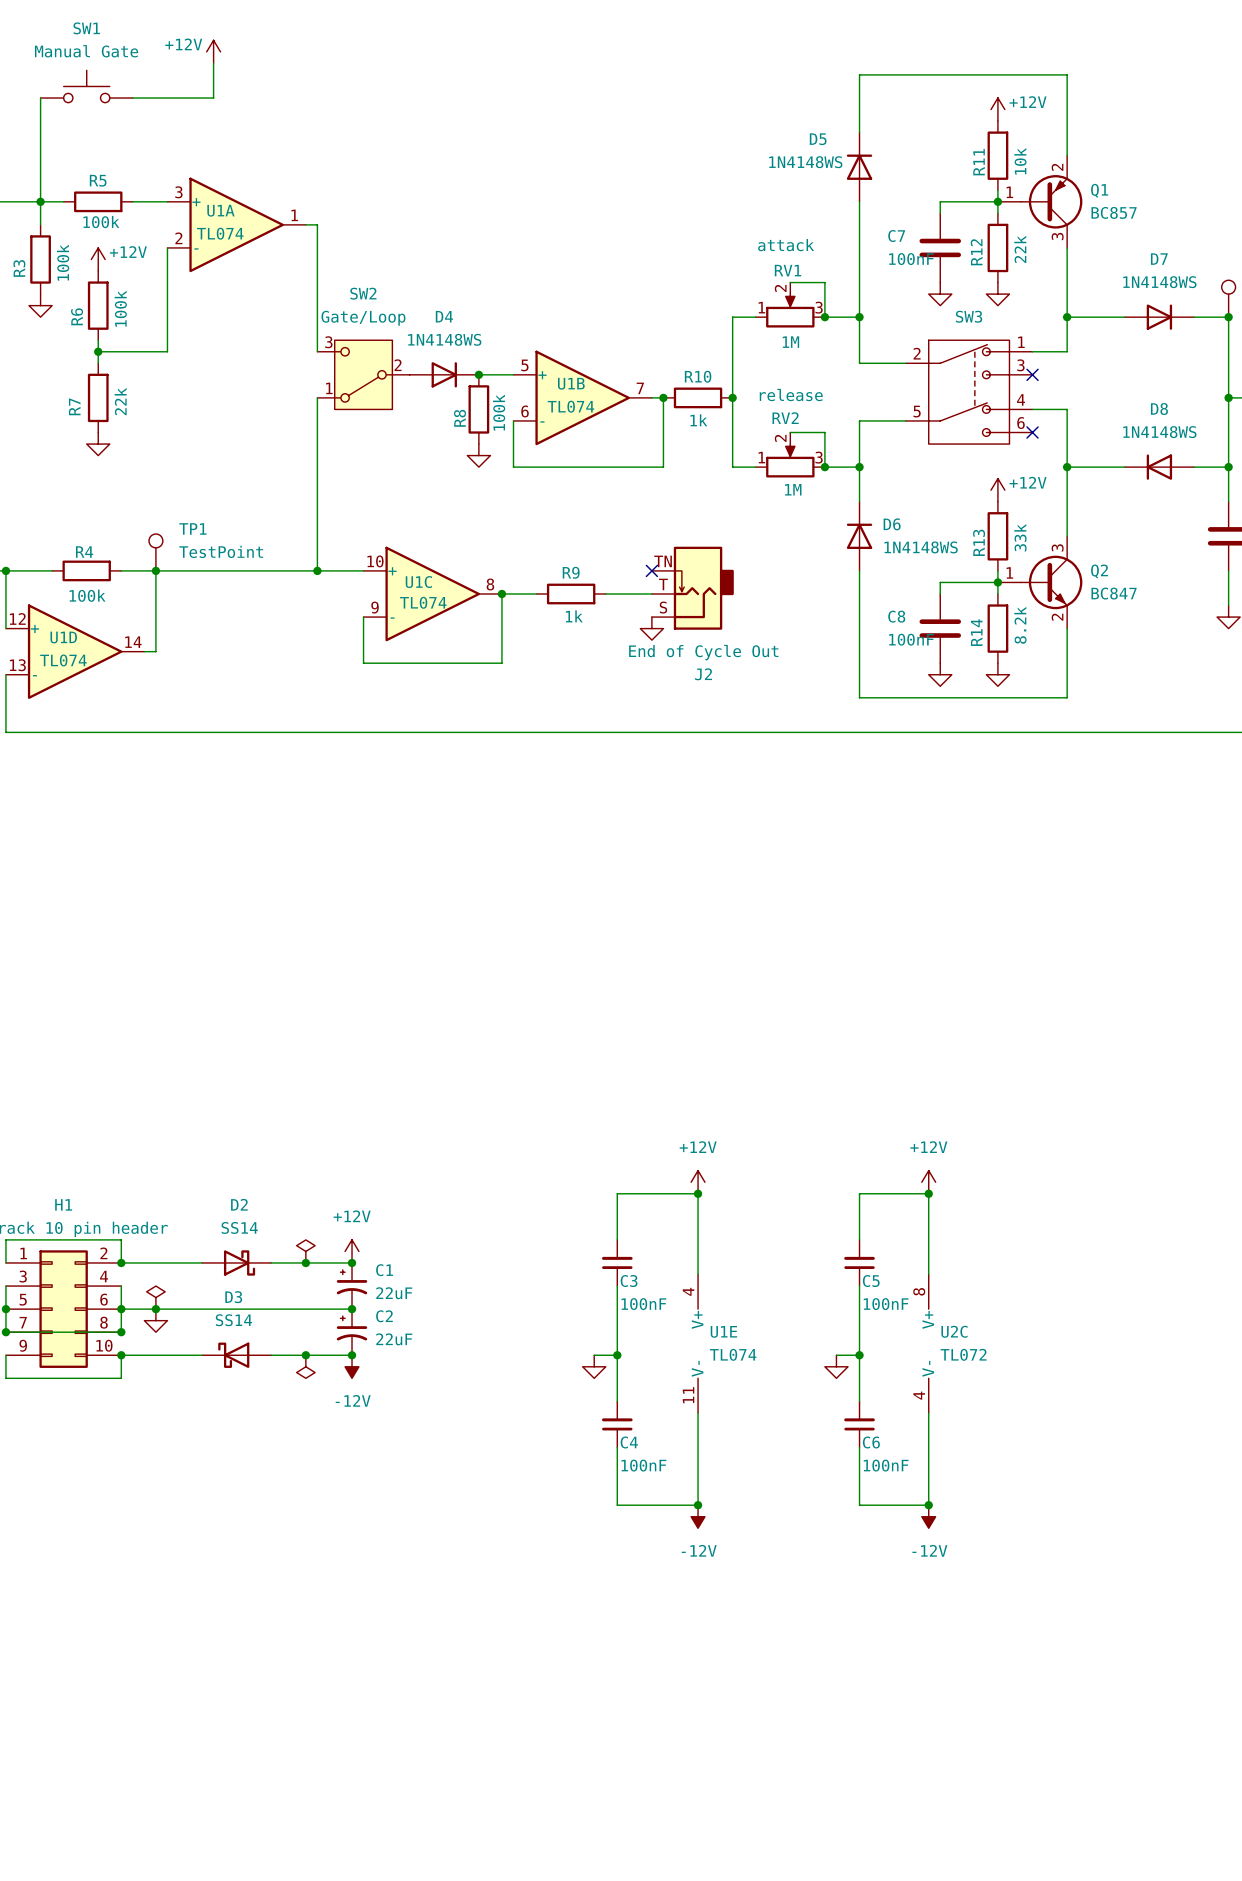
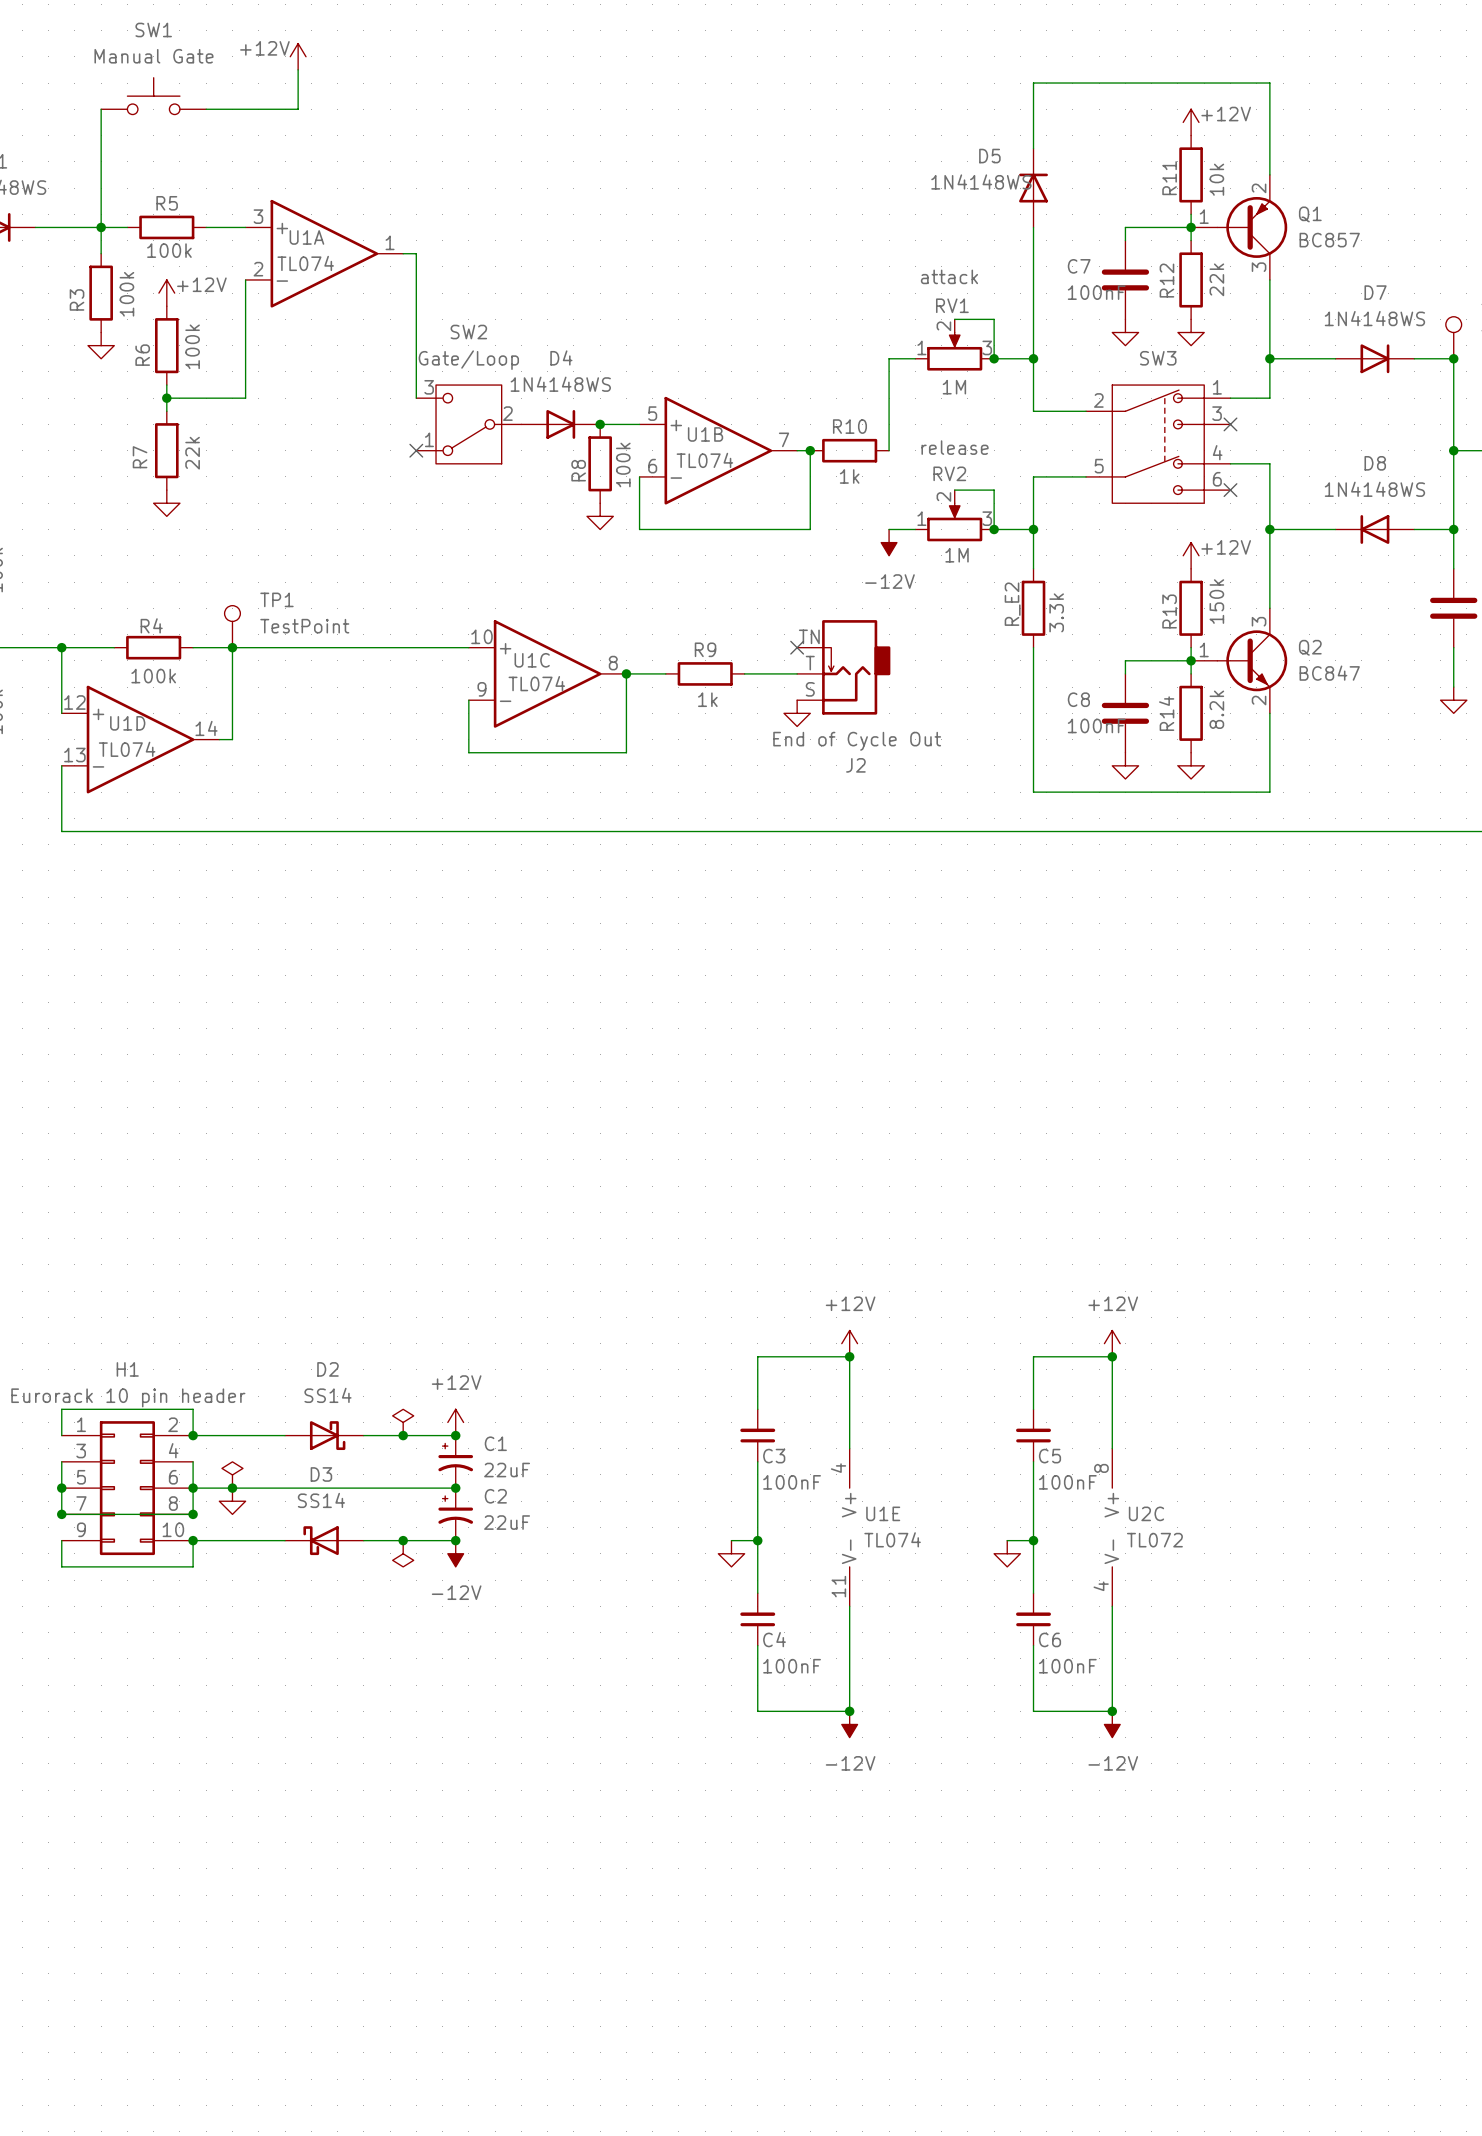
wire: (317, 397) (317, 570) -> none
no-connect mark: none -> (416, 450)
wire: (732, 397) (732, 467) -> none
junction: (732, 397) -> none
power symbol: none -> -12V (889, 542)
D6: 1N4148WS (859, 536) -> none
R_E2: none -> 3.3k (1033, 608)
R13 value: 33k (1020, 537) -> 150k (1216, 601)
junction: (317, 570) -> none

